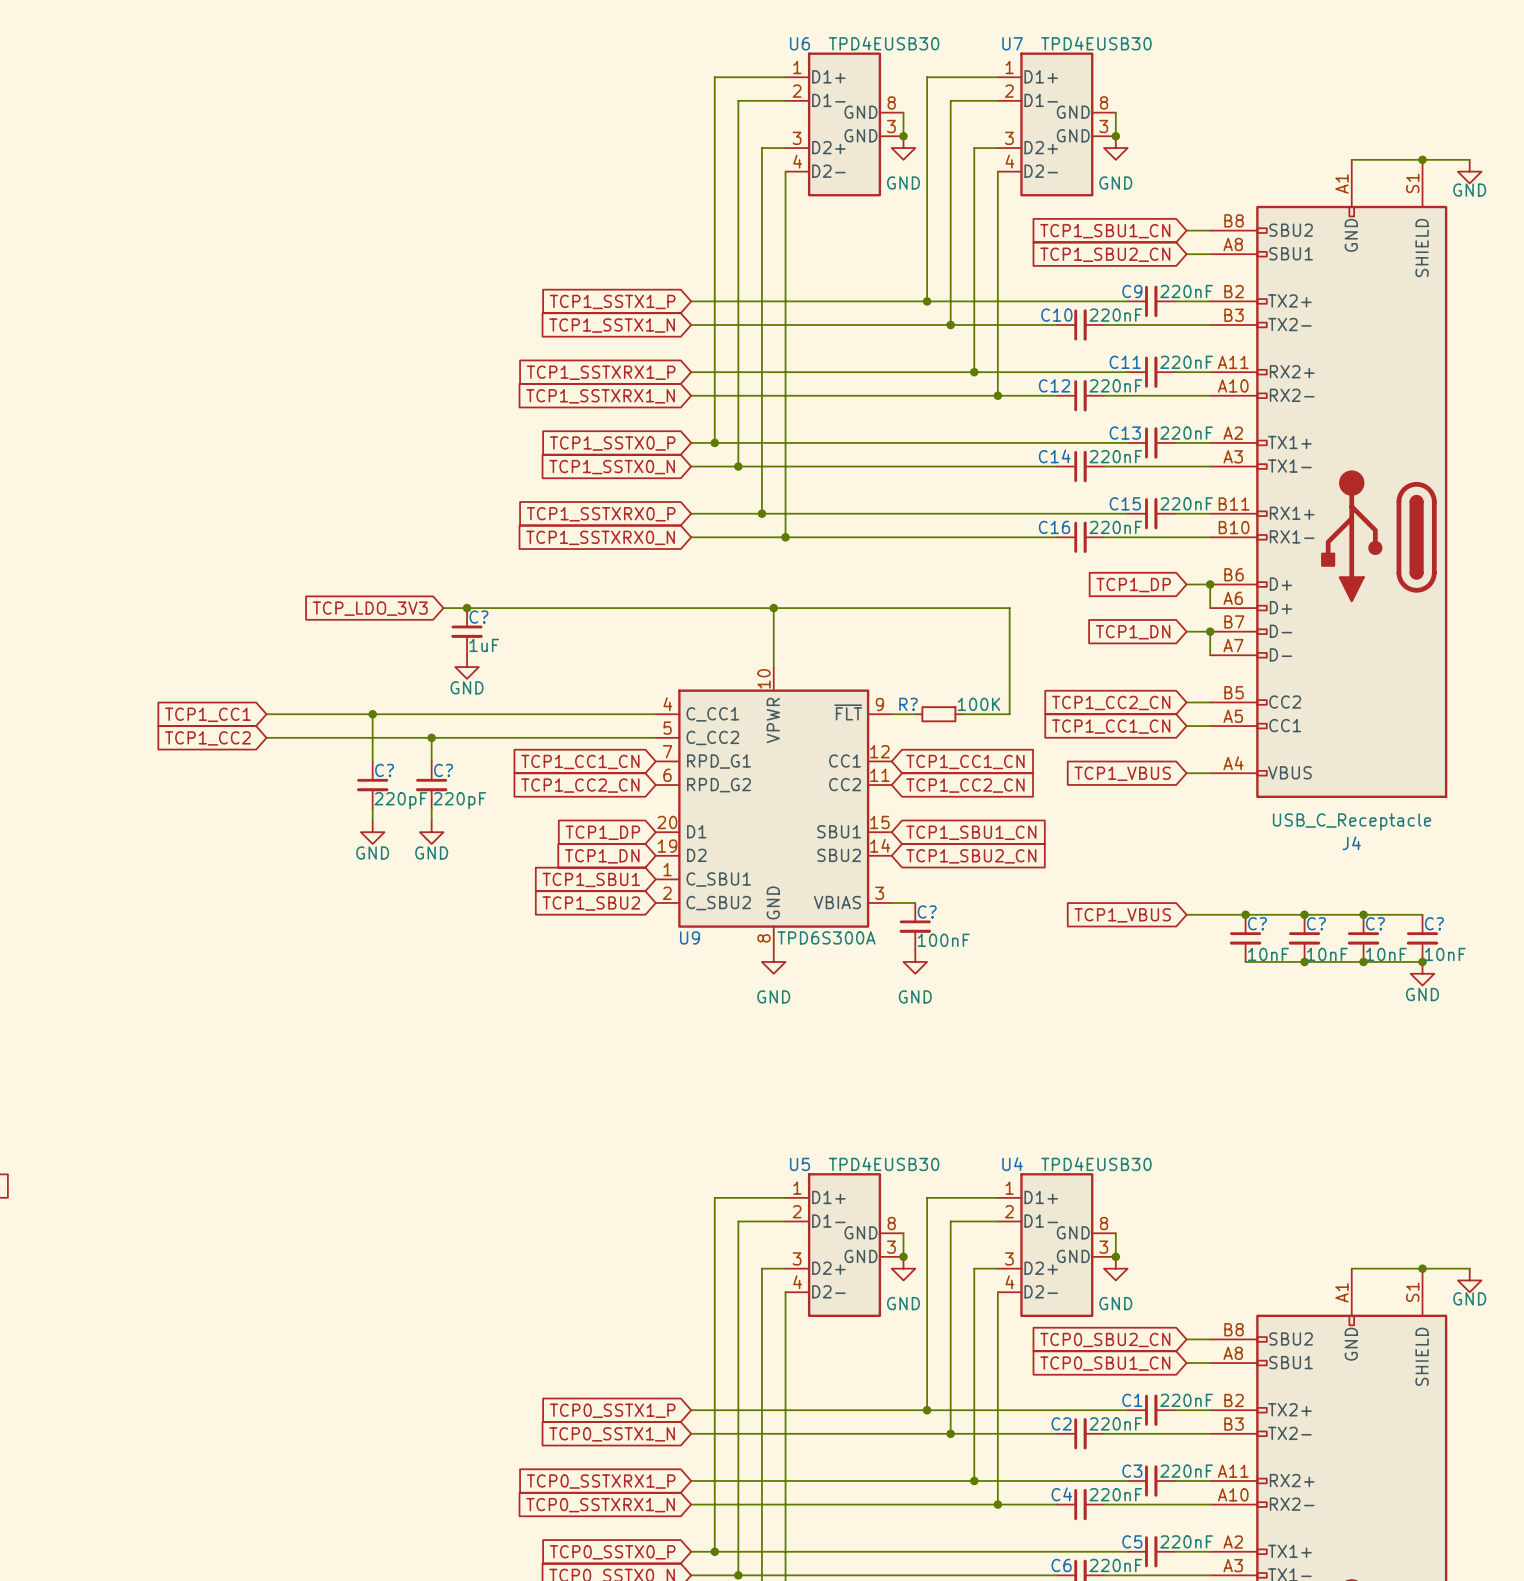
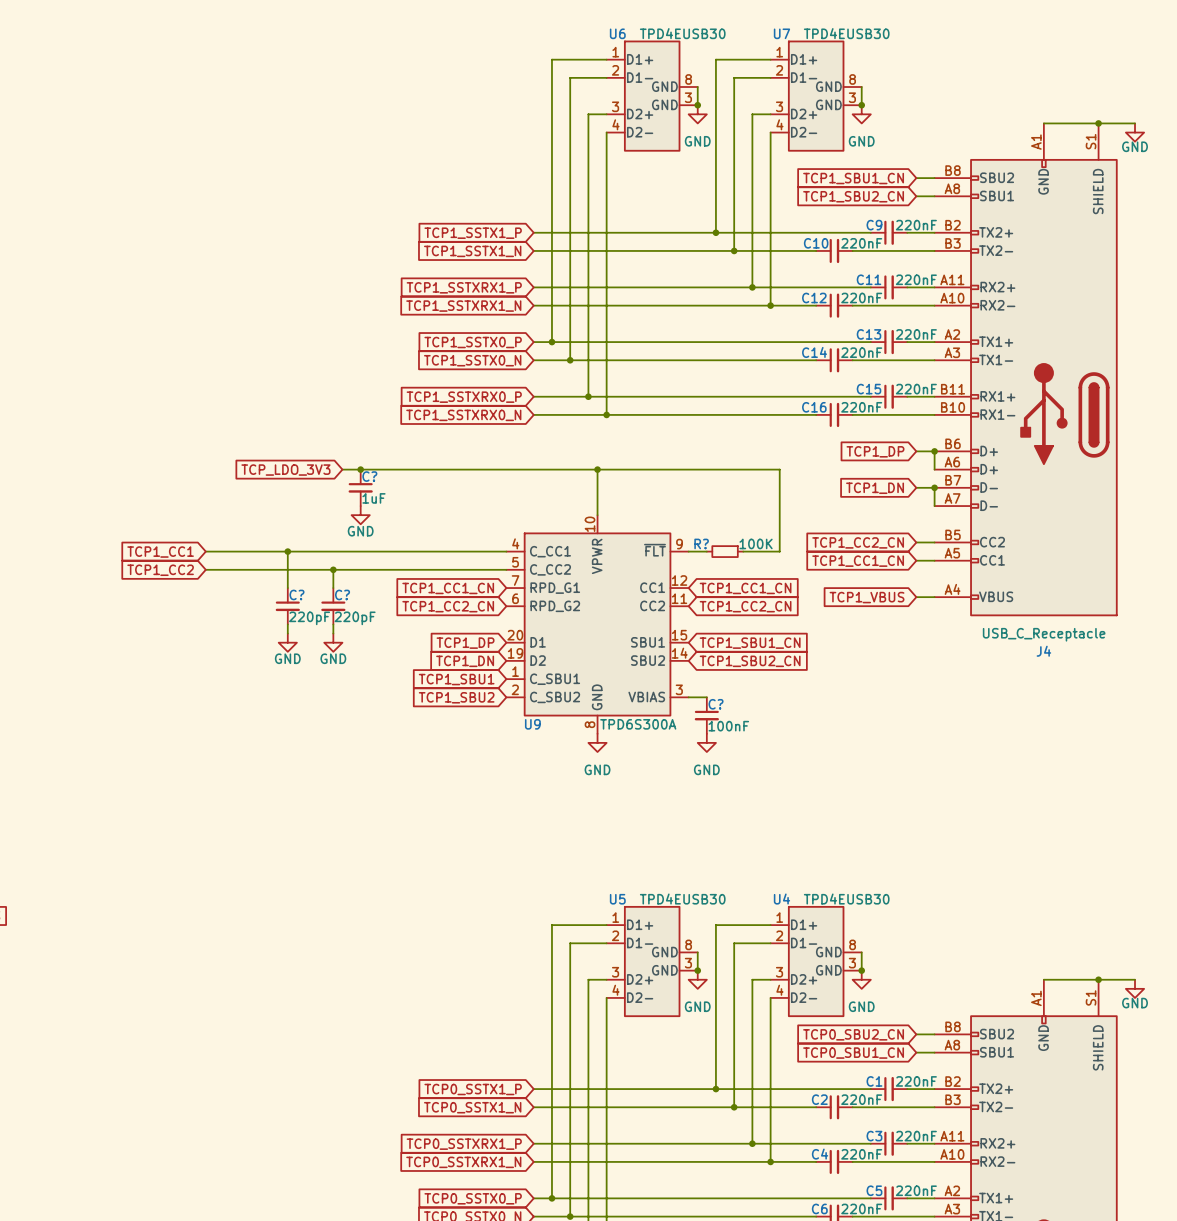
wire: (1186, 914) (1422, 914) -> none
junction: (1245, 914) -> none
junction: (1304, 914) -> none
junction: (1363, 914) -> none
global label: TCP1_VBUS (1122, 915) -> none
C?: 10nF (1245, 938) -> none
C?: 10nF (1304, 938) -> none
C?: 10nF (1363, 938) -> none
C?: 10nF (1422, 938) -> none
wire: (1245, 961) (1422, 961) -> none
junction: (1304, 961) -> none
junction: (1363, 961) -> none
junction: (1422, 961) -> none
power symbol: GND (1422, 973) -> none

